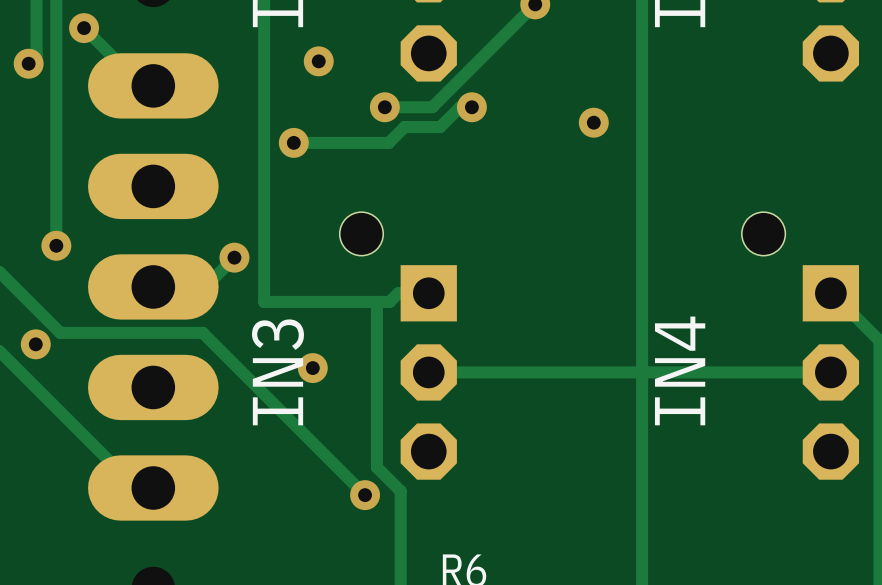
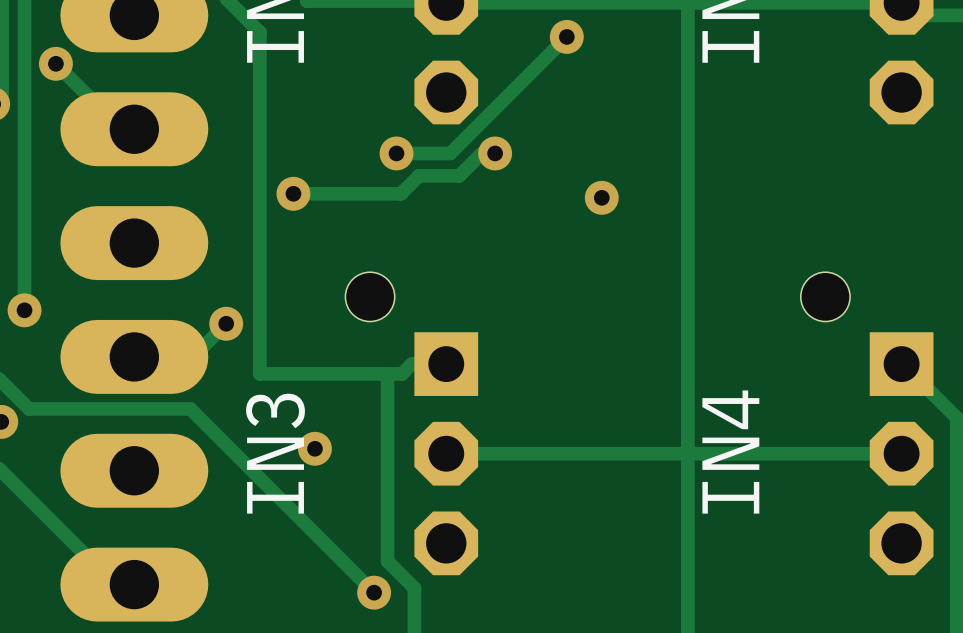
via: (318, 61) -> none
via position: (593, 122) -> (601, 197)

